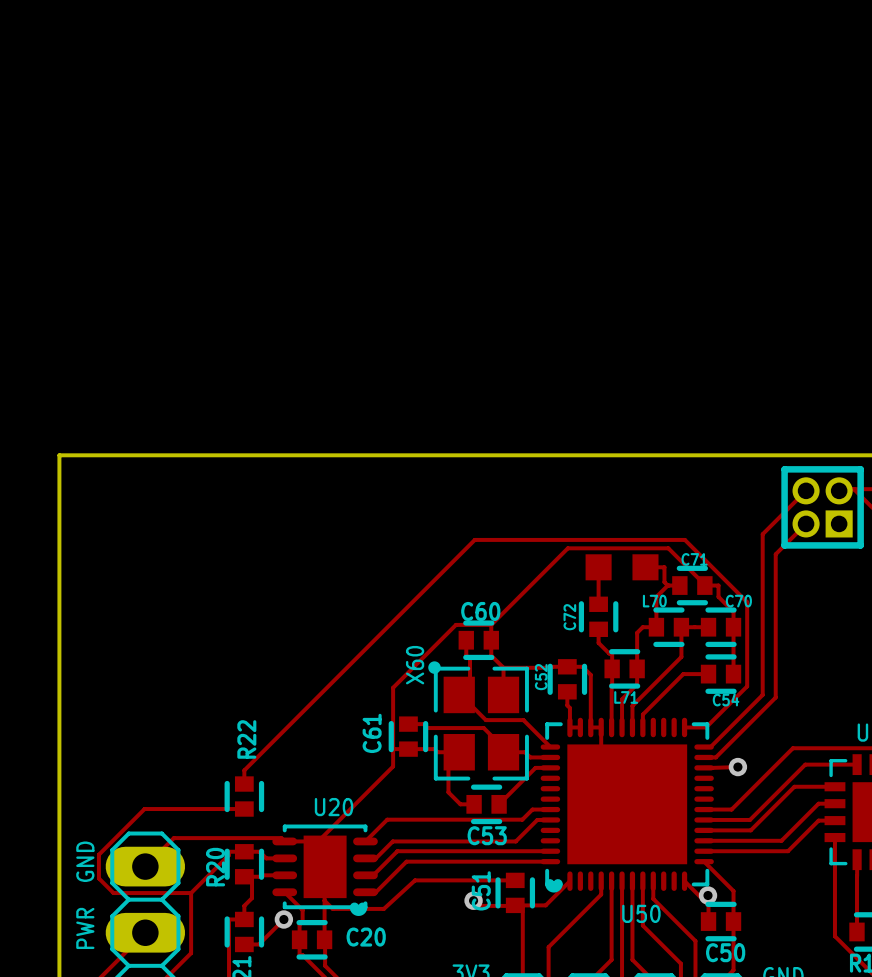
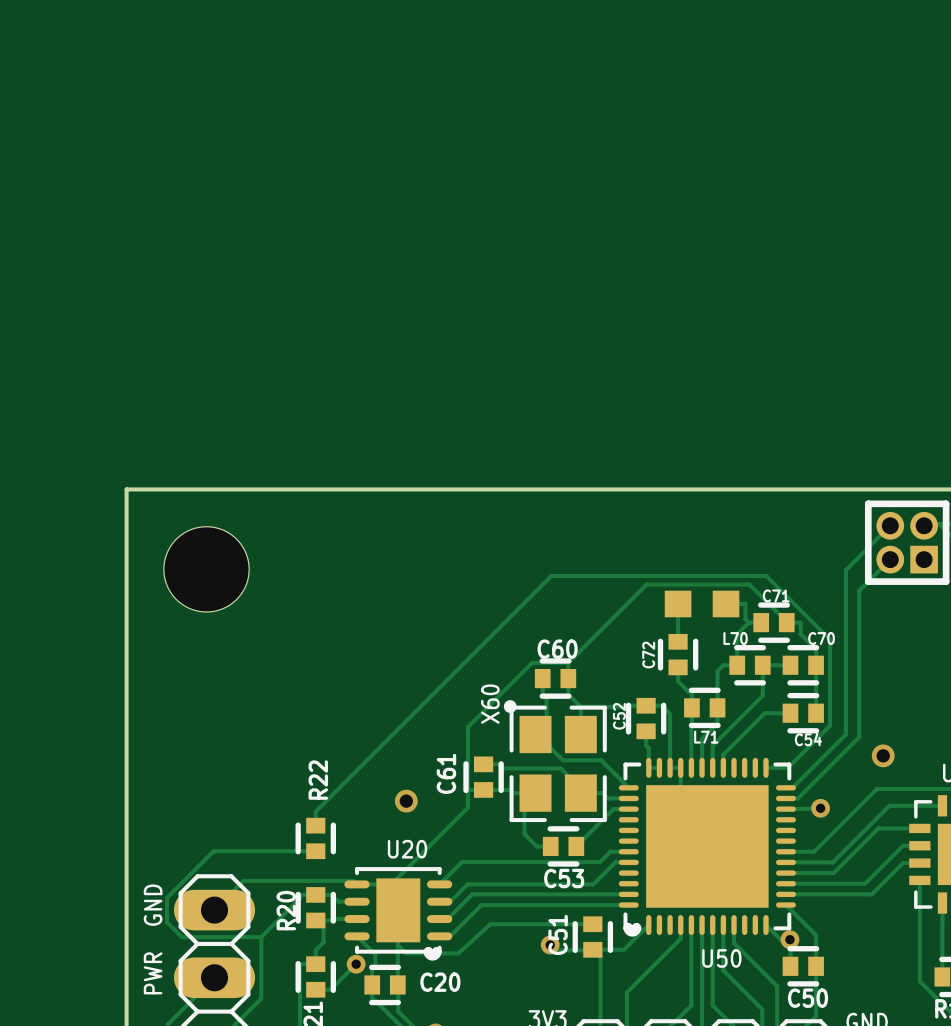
hole: none -> (206, 569)
via: none -> (883, 755)
via: none -> (406, 801)

